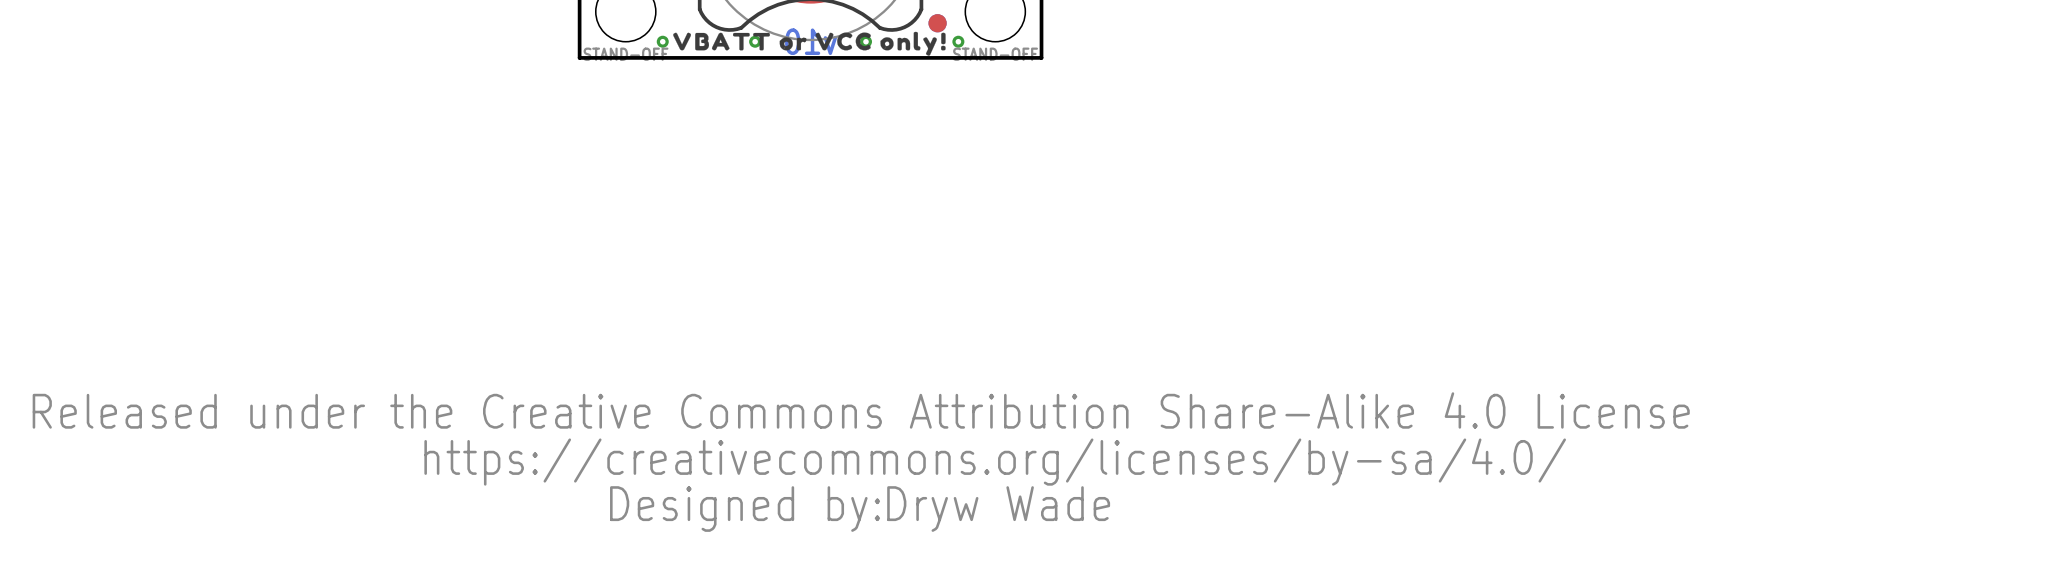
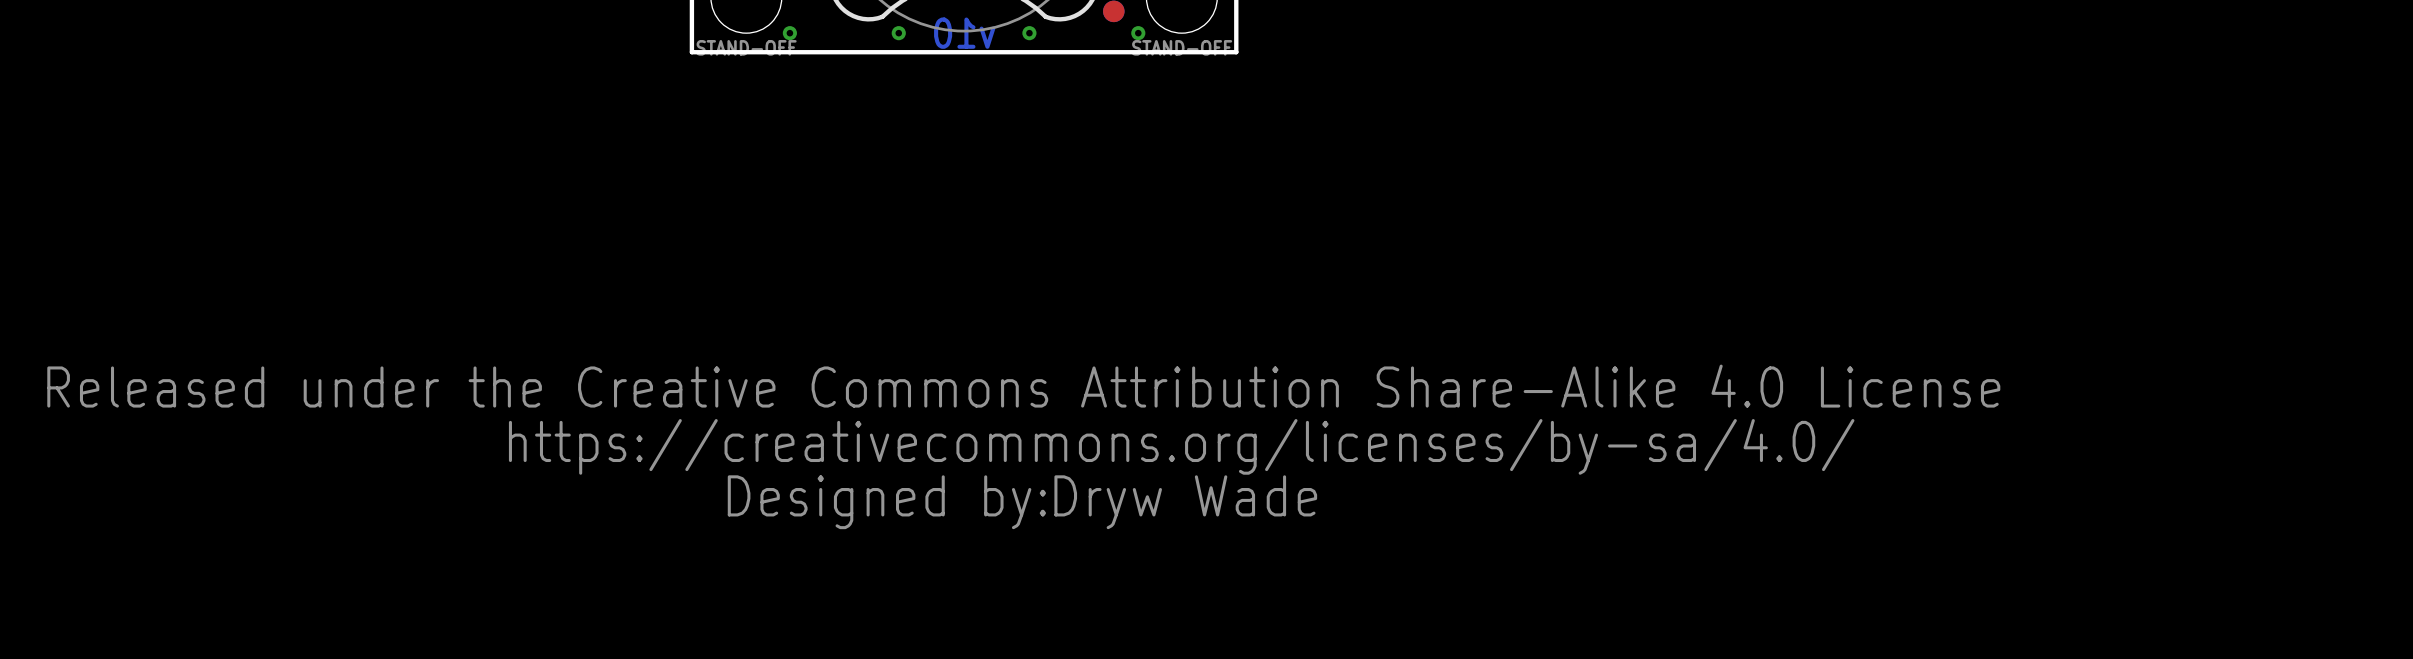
drawing: [673, 31, 946, 56] -> none
drawing position: (861, 462) -> (1023, 446)
text position: Dryw Wade (998, 509) -> Dryw Wade (1185, 502)

